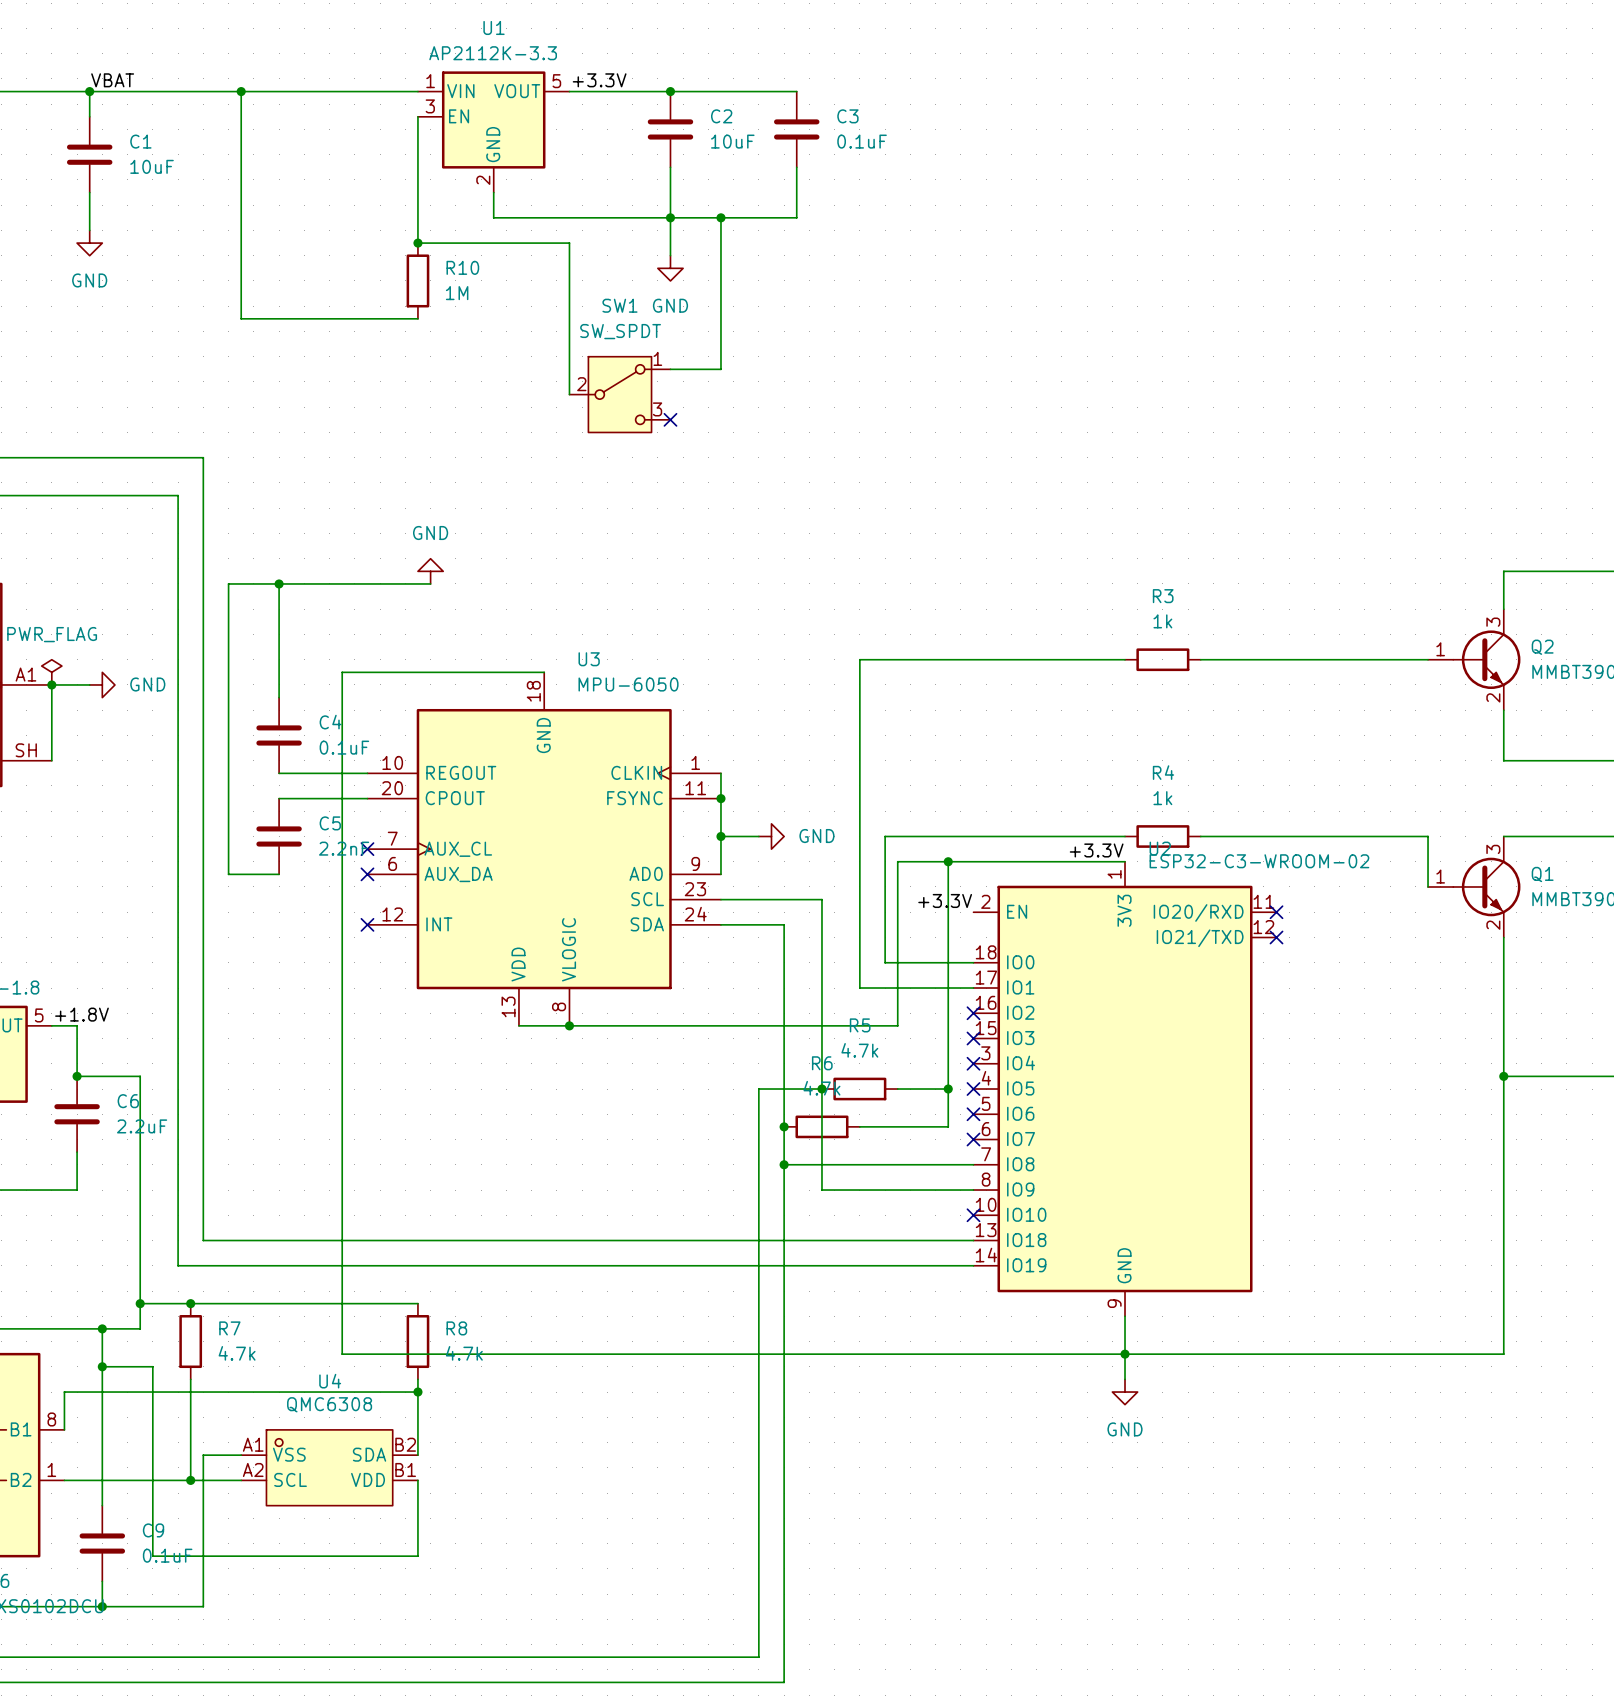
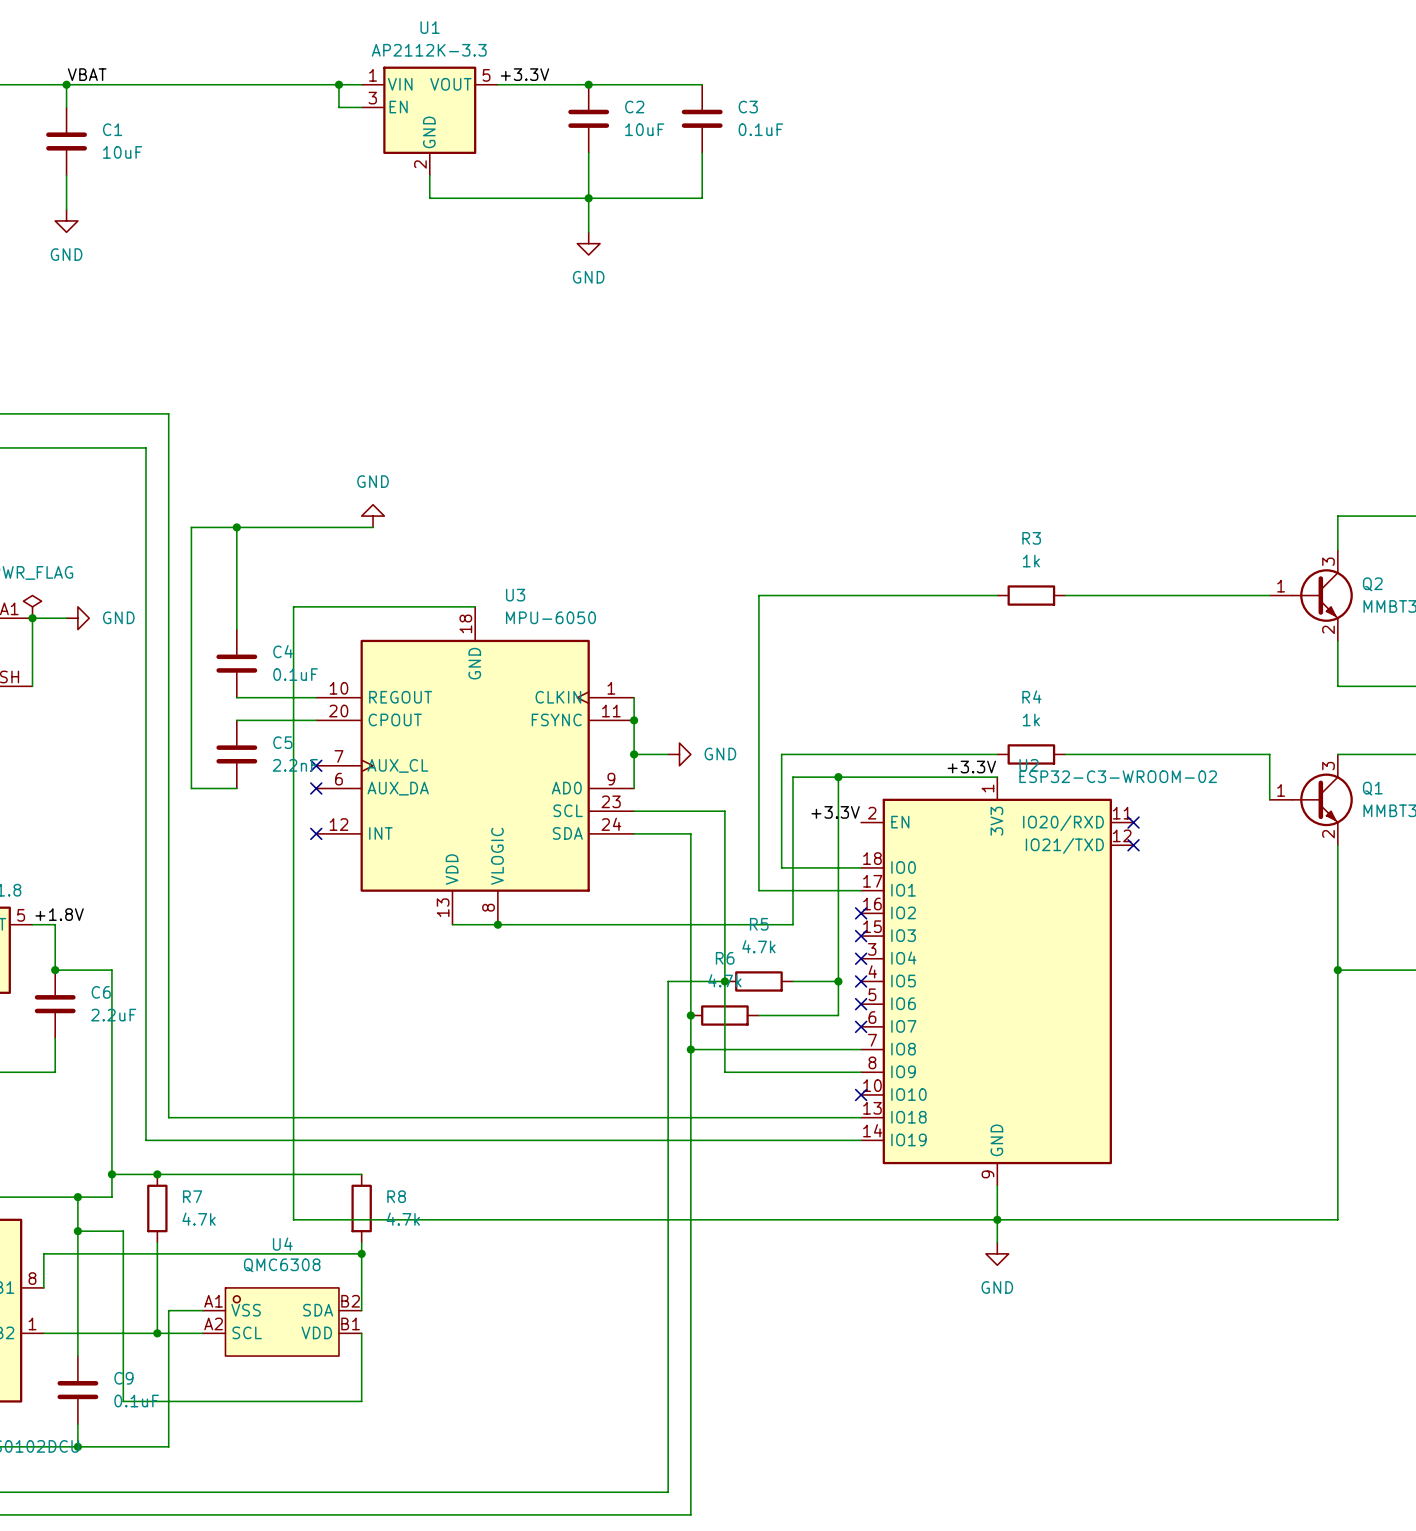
wire: (241, 91) (241, 318) (417, 318) -> none
junction: (241, 91) -> none
junction: none -> (338, 84)
wire: (417, 116) (417, 243) (569, 243) (569, 394) -> (361, 107) (338, 107) (338, 84)
wire: (720, 217) (720, 369) (670, 369) -> none
junction: (720, 217) -> none
junction: (417, 243) -> none
R10: 1M (417, 280) -> none
SW1: SW_SPDT (619, 394) -> none
no-connect mark: (670, 419) -> none

